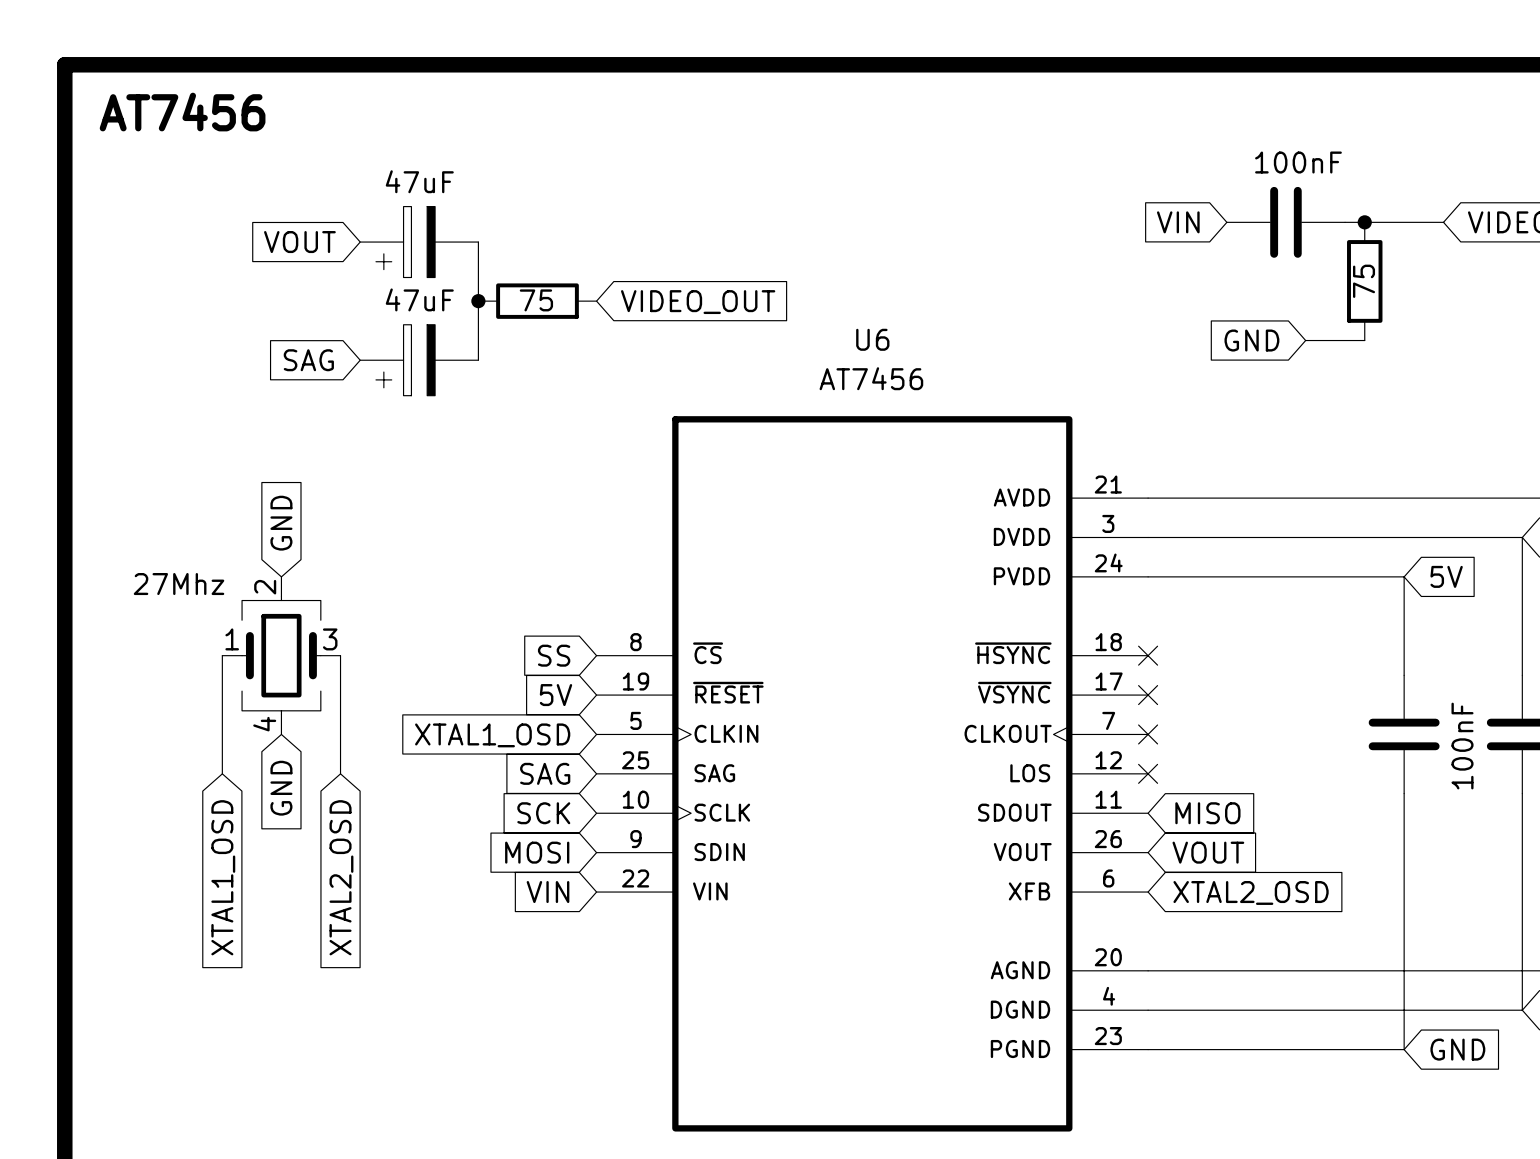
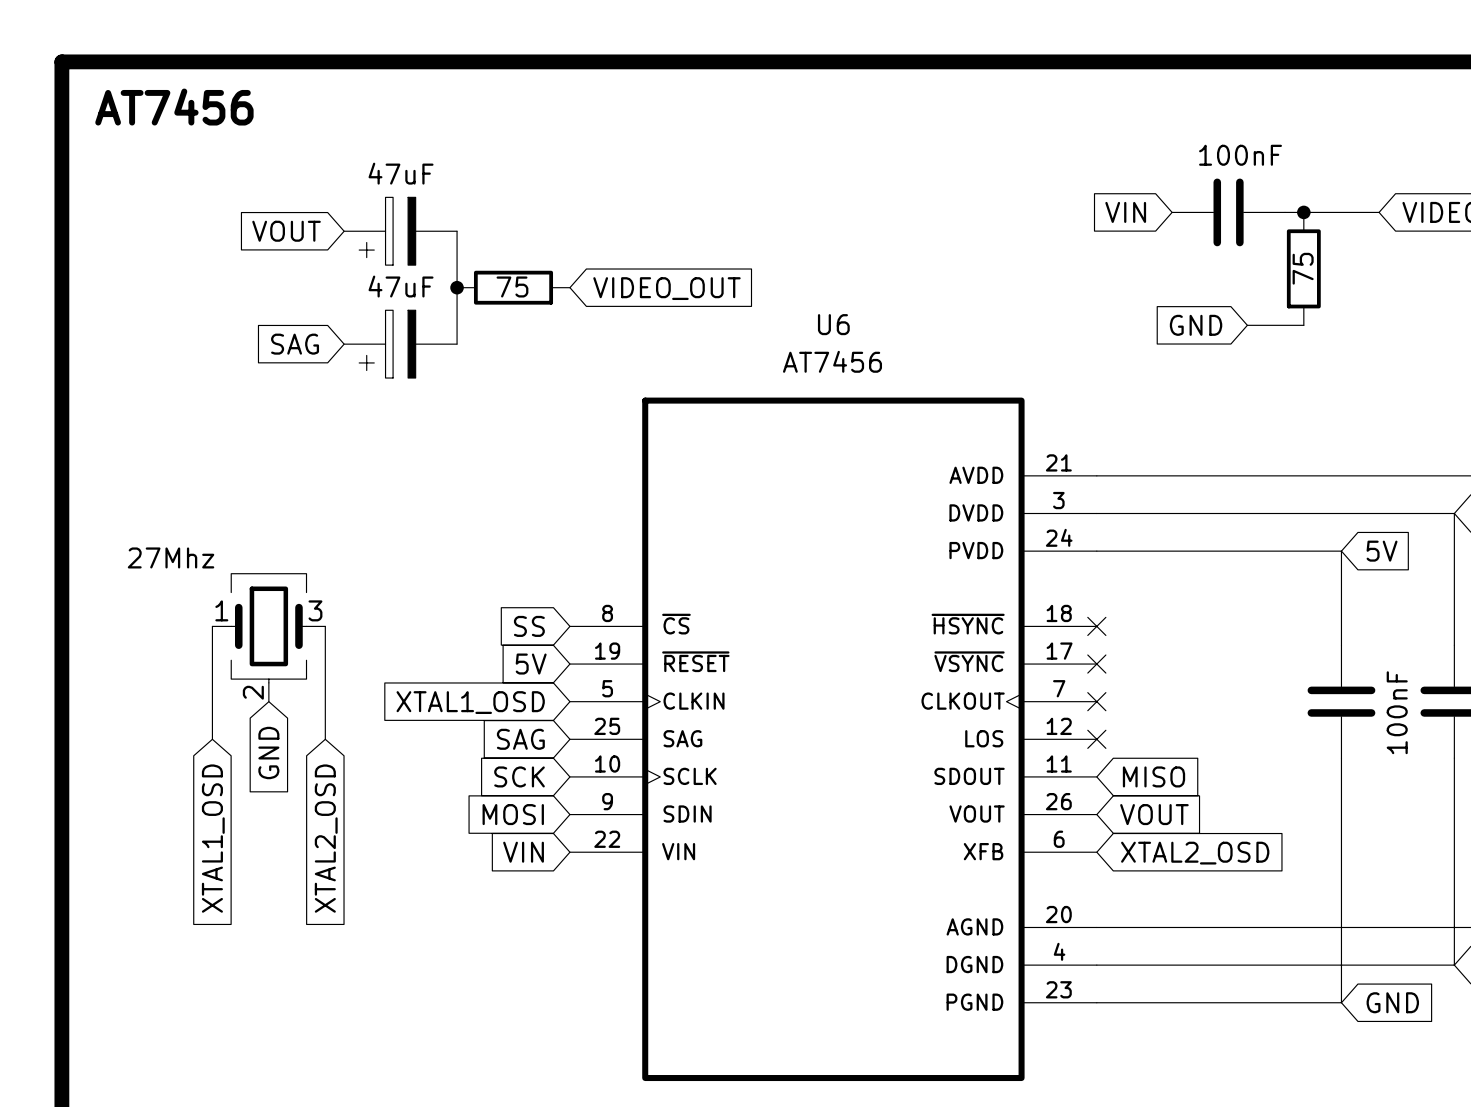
global label: GND (281, 523) -> none
part symbol: [222, 576, 341, 735] -> [212, 573, 326, 702]

